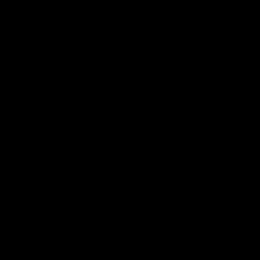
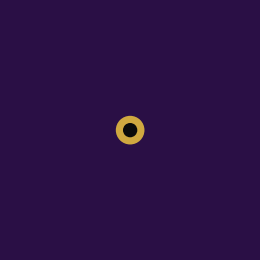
via: none -> (130, 130)

